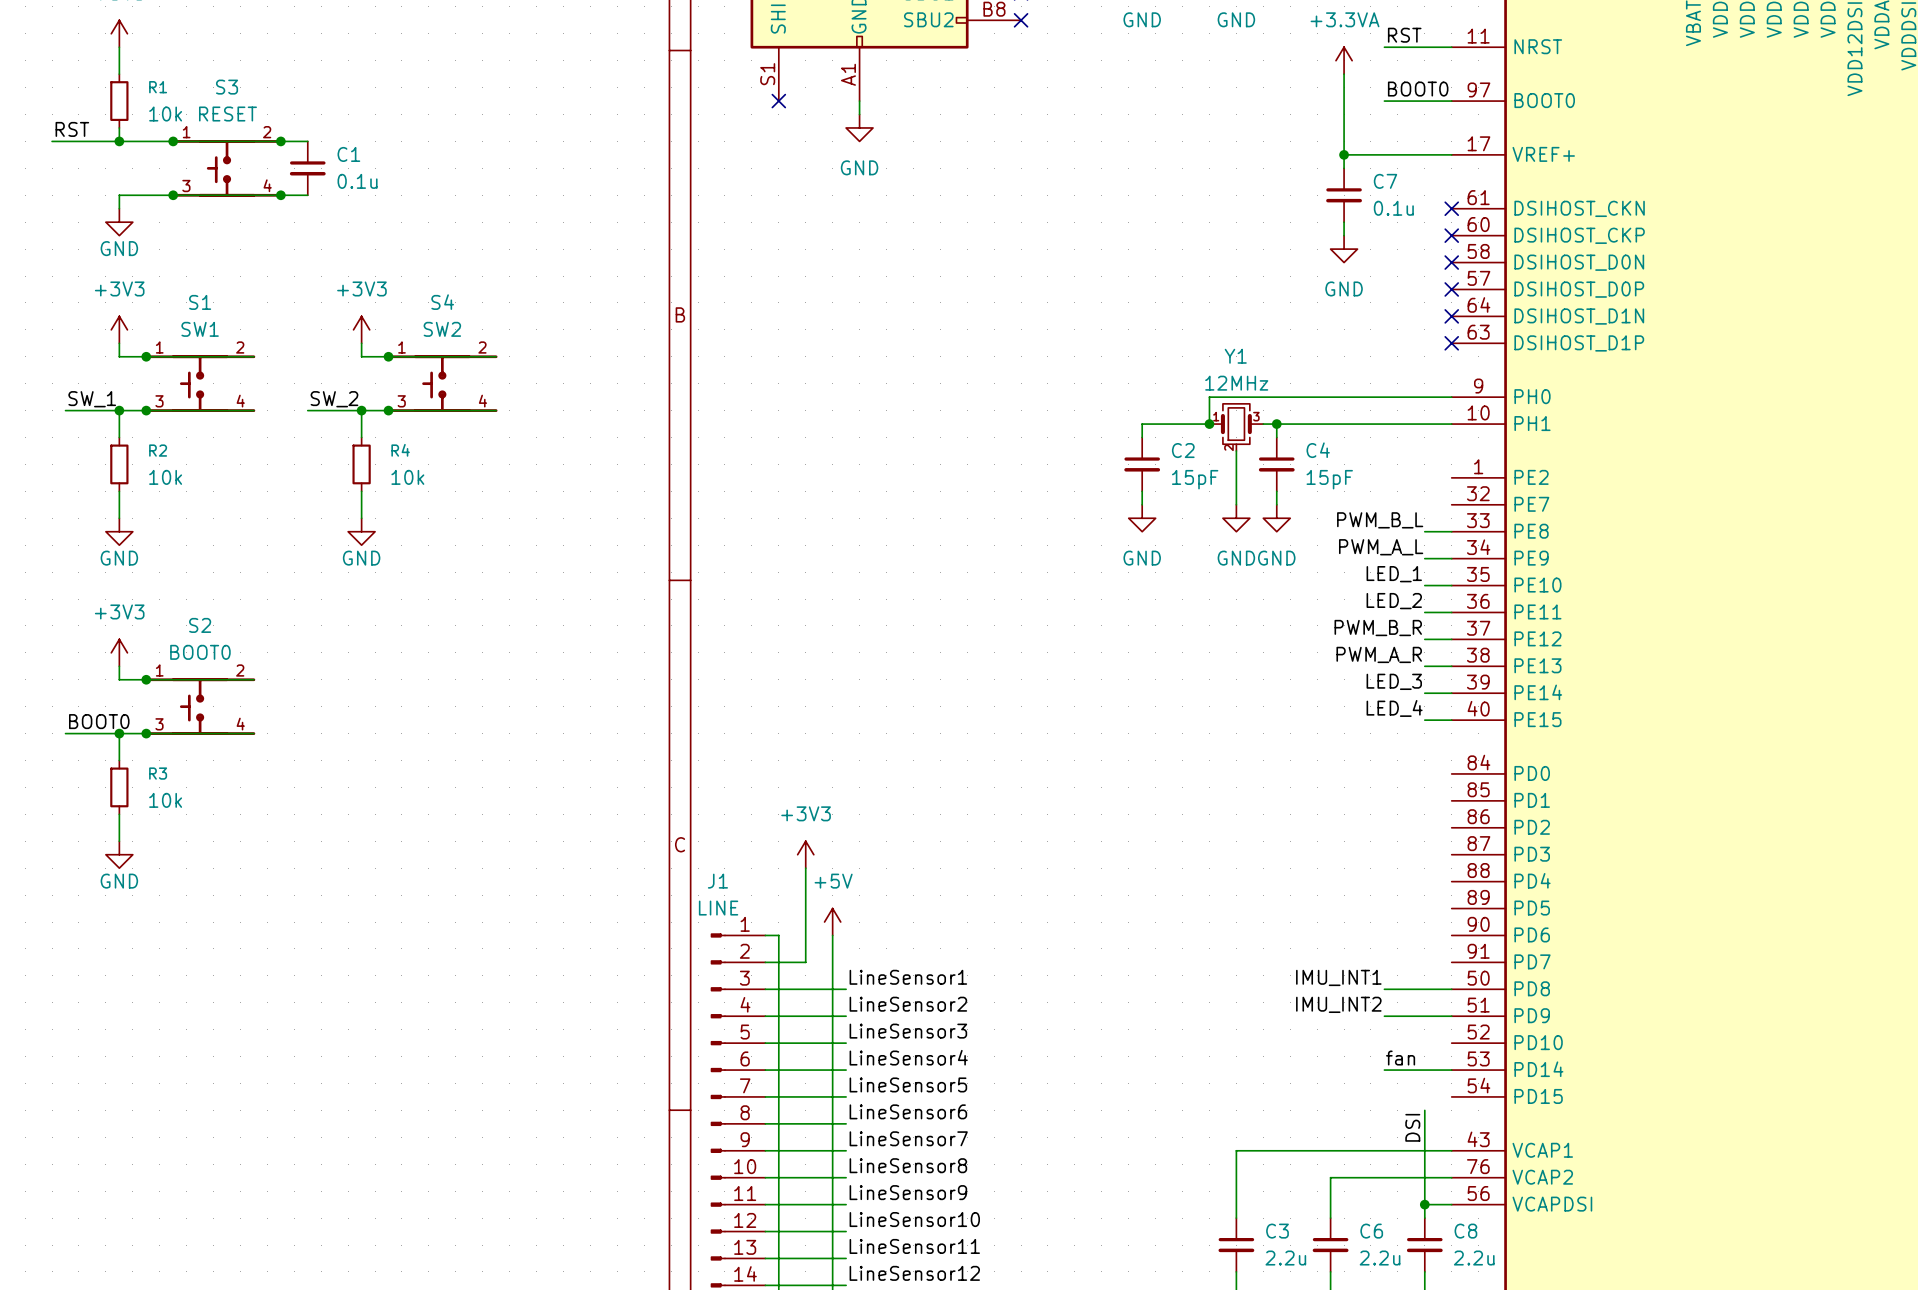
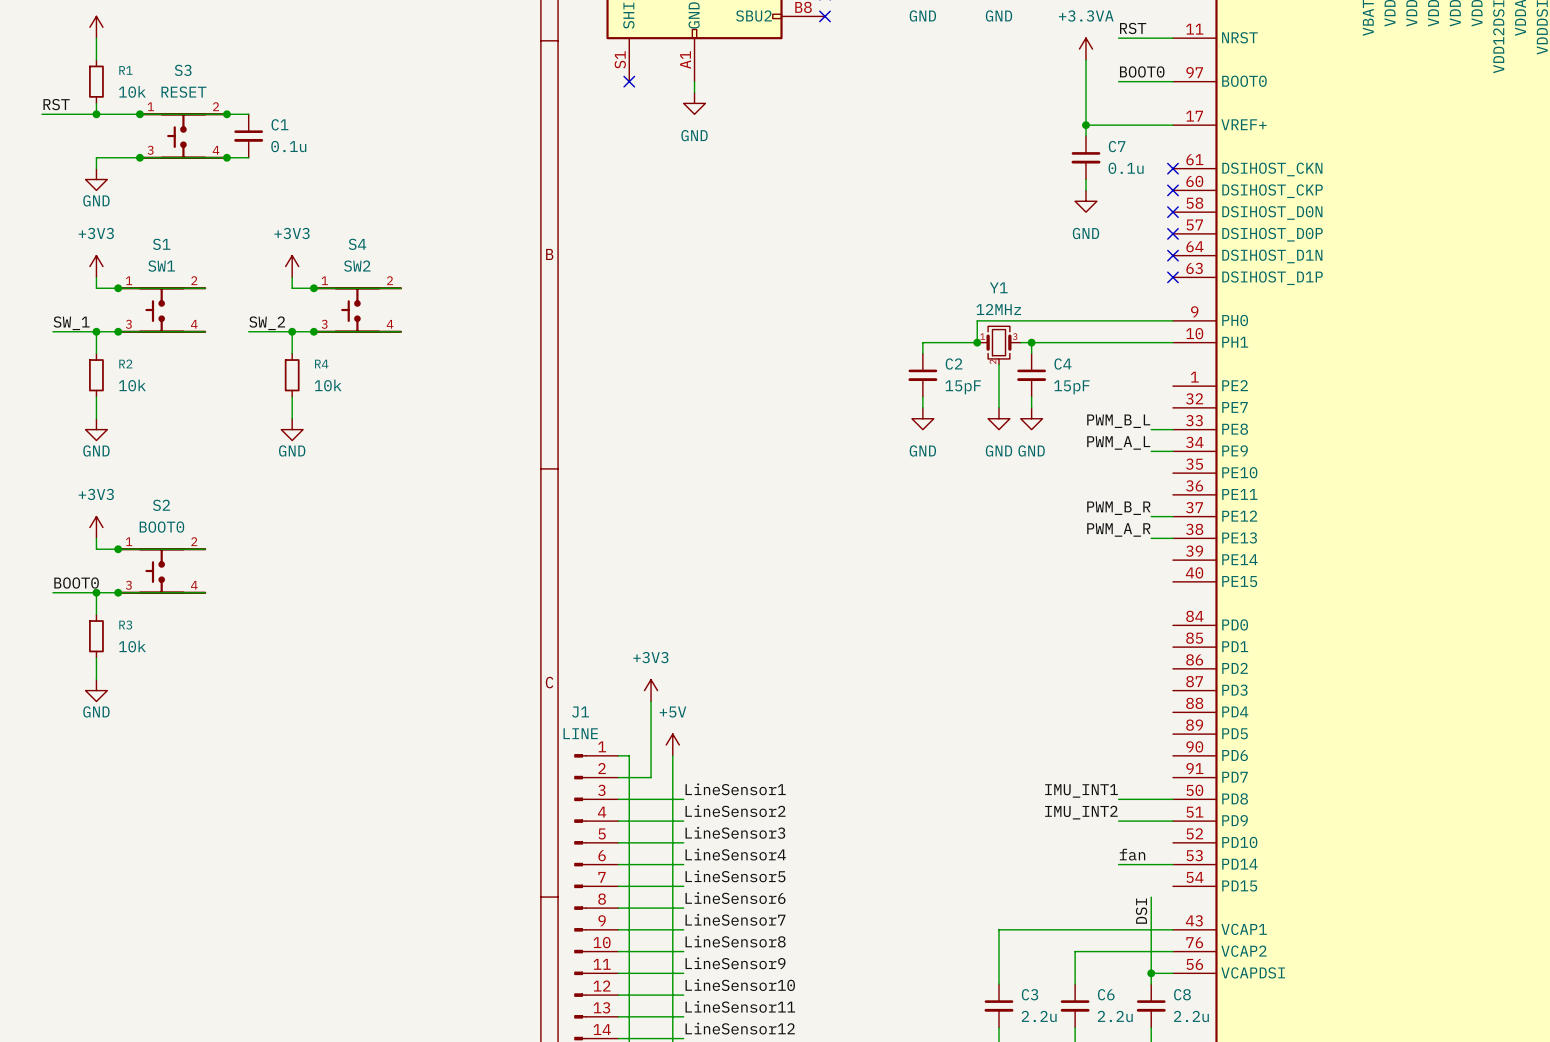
label: LED_1 (1394, 574) -> none
wire: (1424, 585) (1451, 585) -> none
label: LED_2 (1394, 601) -> none
wire: (1424, 612) (1451, 612) -> none
label: LED_3 (1394, 681) -> none
wire: (1424, 693) (1451, 693) -> none
label: LED_4 (1394, 708) -> none
wire: (1424, 720) (1451, 720) -> none

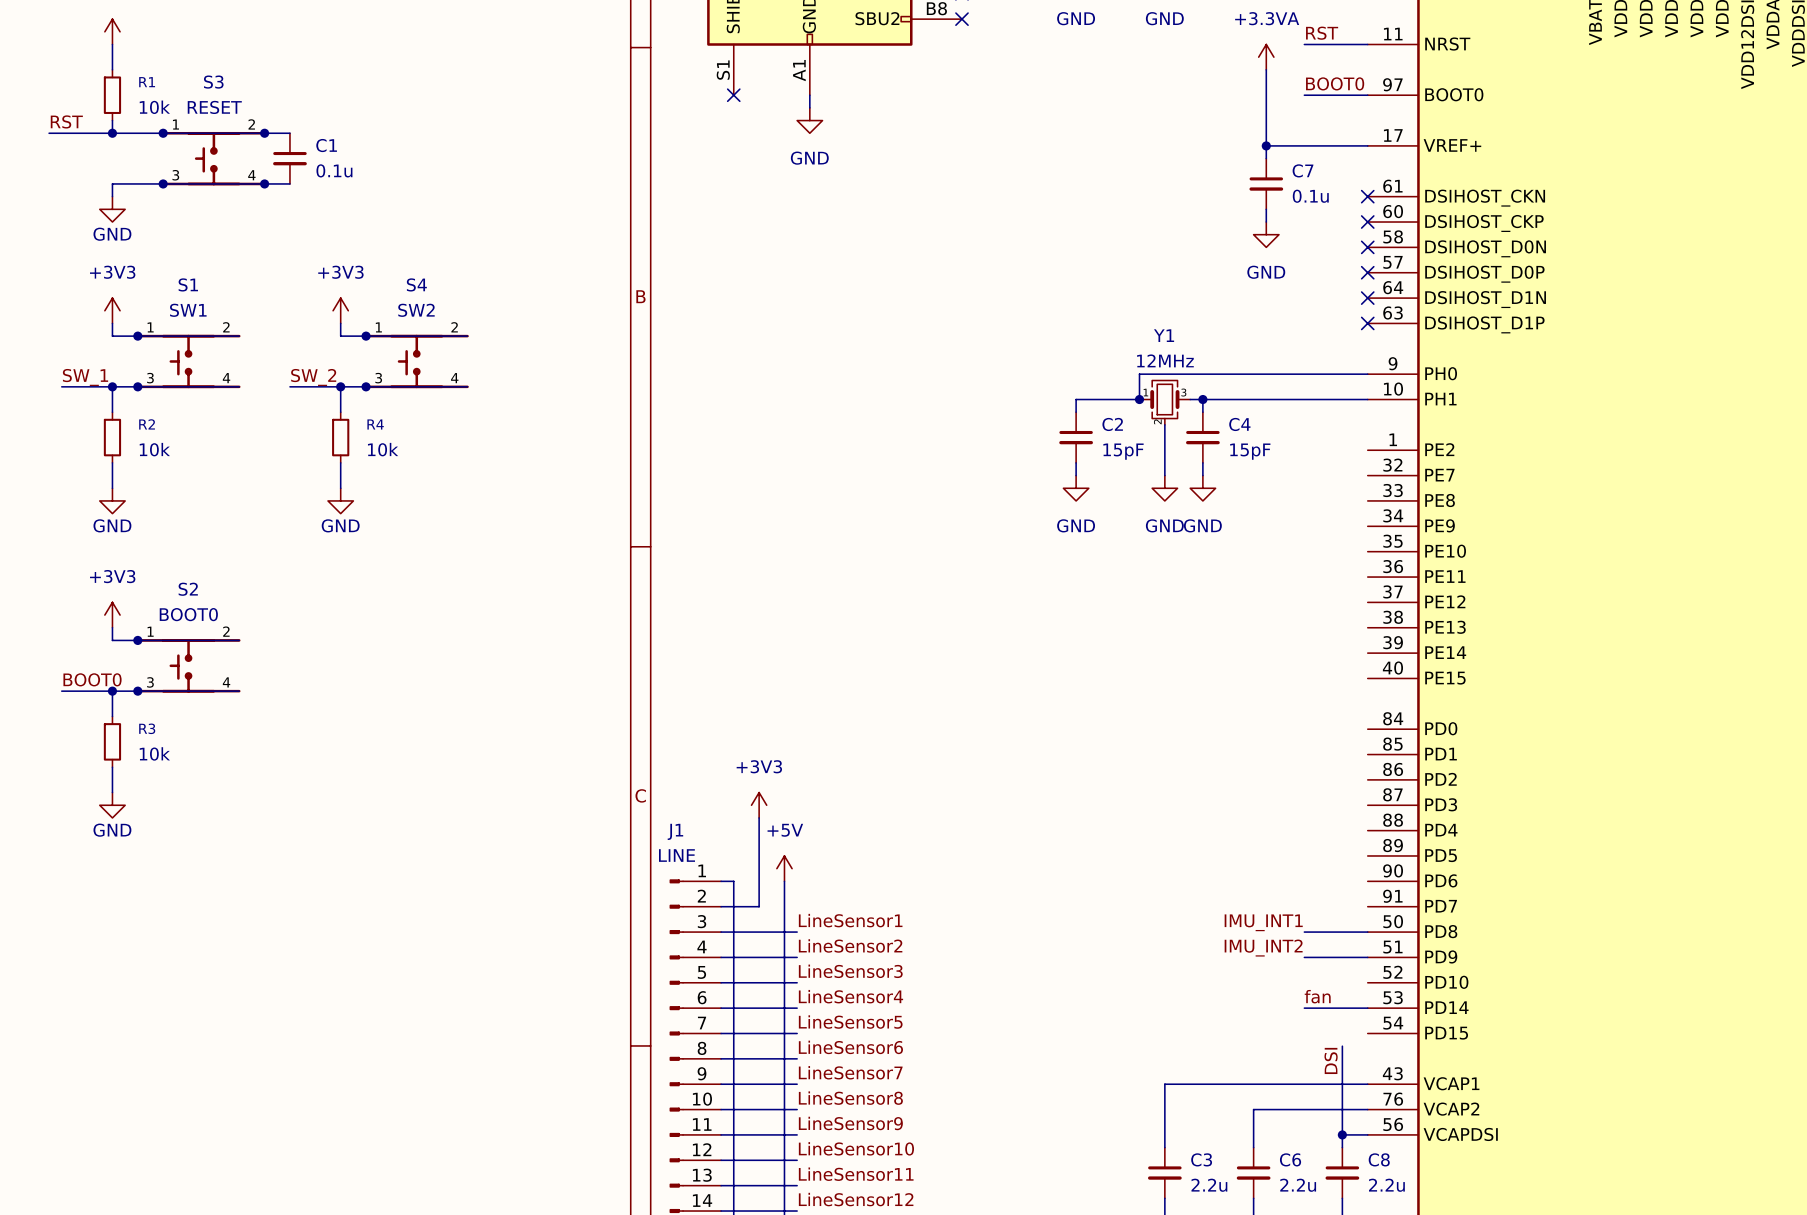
label: PWM_B_L (1118, 421) -> none
wire: (1151, 429) (1172, 429) -> none
label: PWM_A_L (1118, 442) -> none
wire: (1151, 451) (1172, 451) -> none
label: PWM_B_R (1118, 508) -> none
wire: (1151, 516) (1172, 516) -> none
label: PWM_A_R (1118, 529) -> none
wire: (1151, 538) (1172, 538) -> none

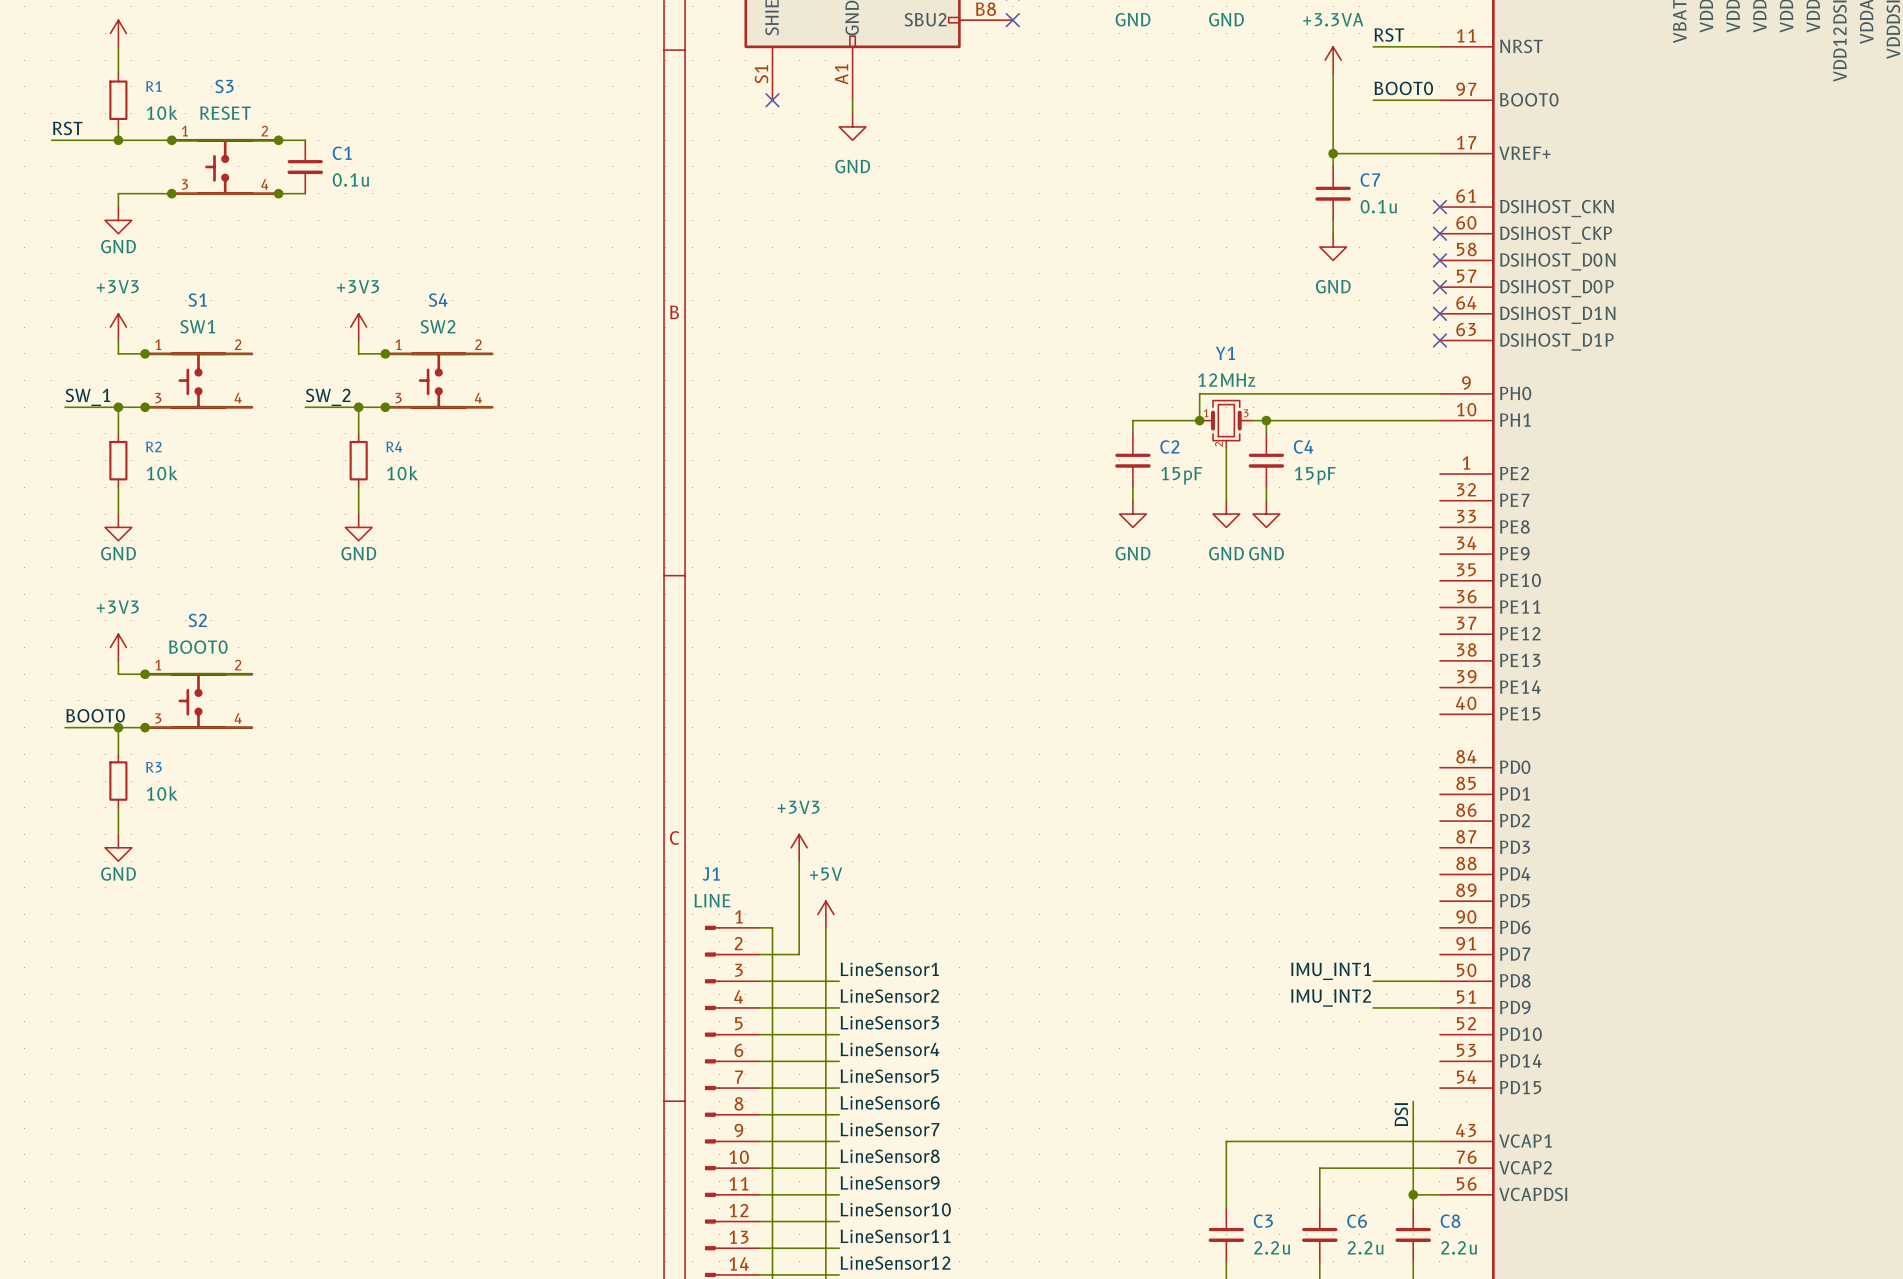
label: fan (1317, 996) -> none
wire: (1304, 1008) (1367, 1008) -> none

